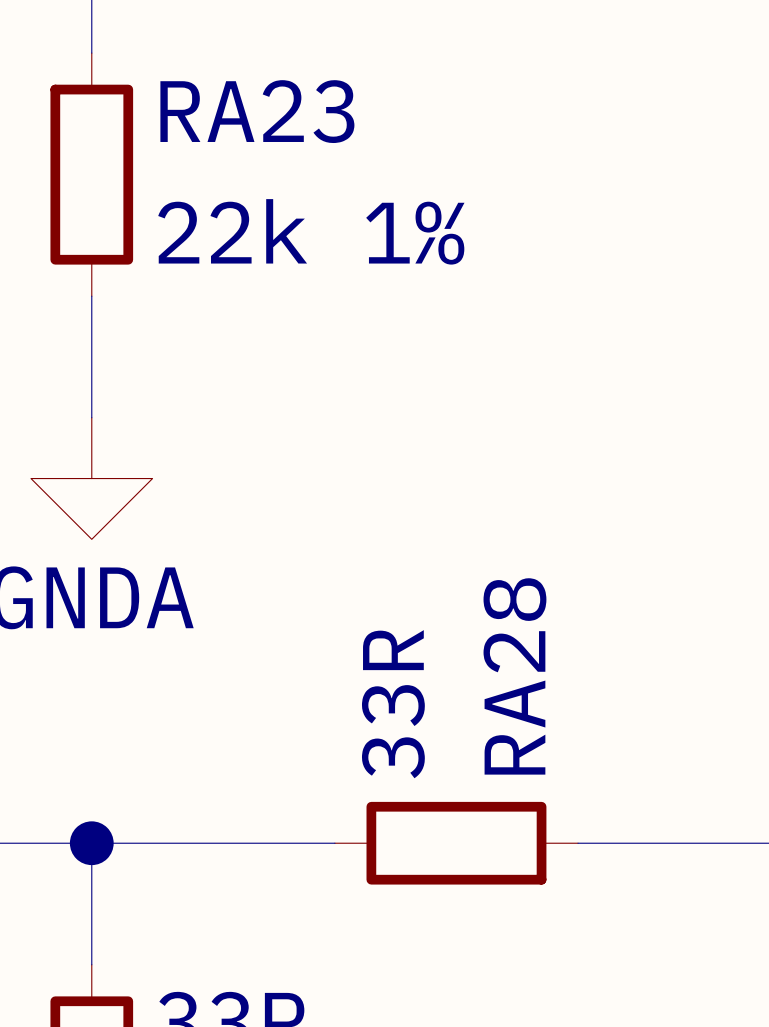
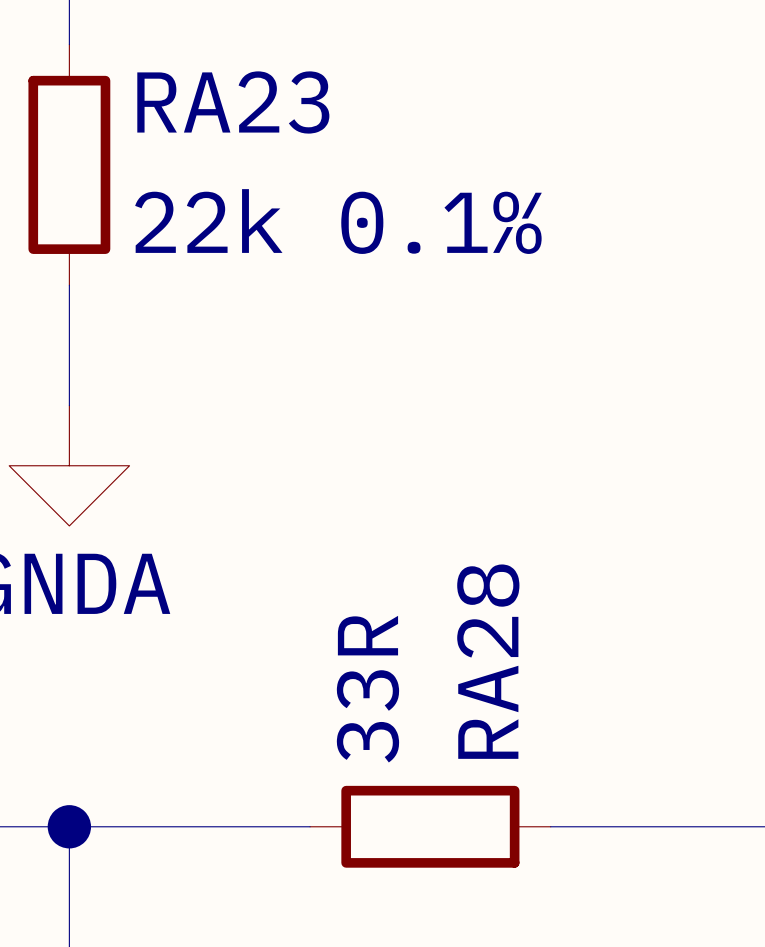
RA23 value: 22k 1% (311, 231) -> 22k 0.1% (338, 221)

